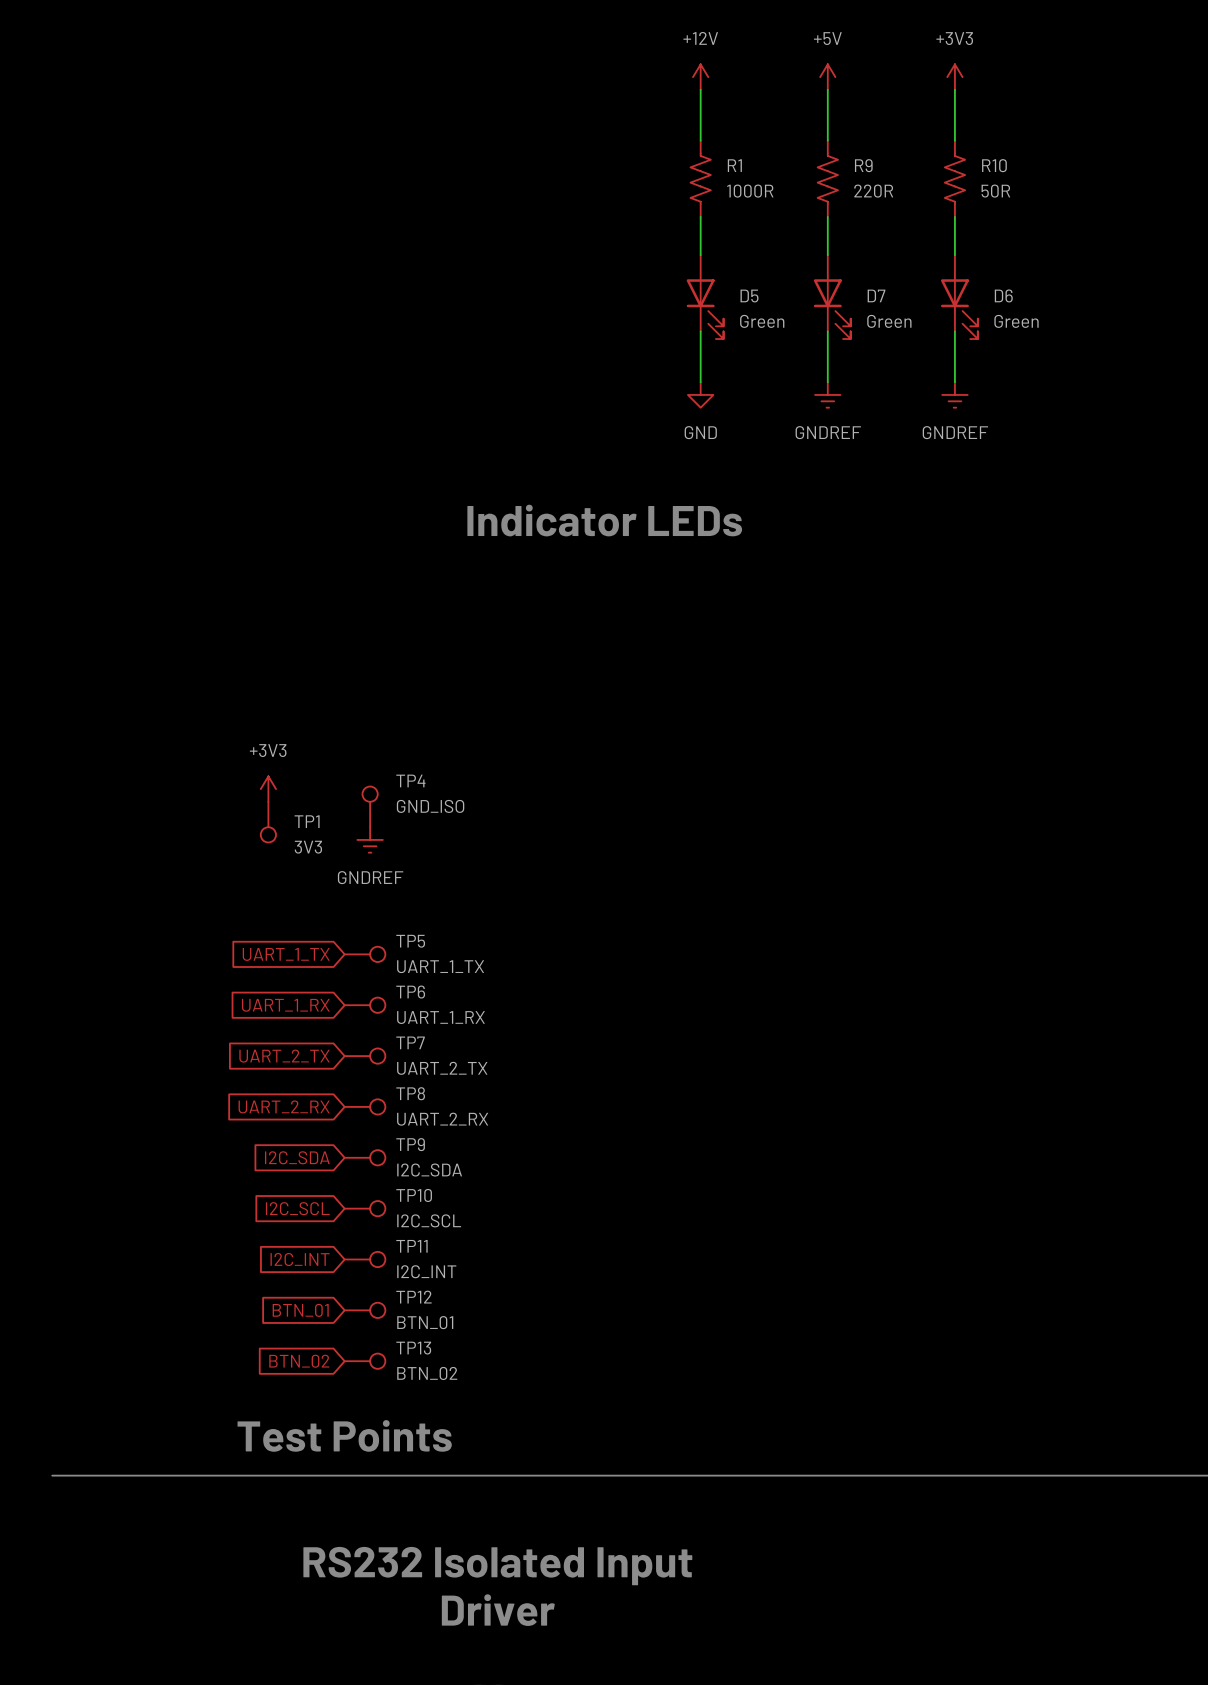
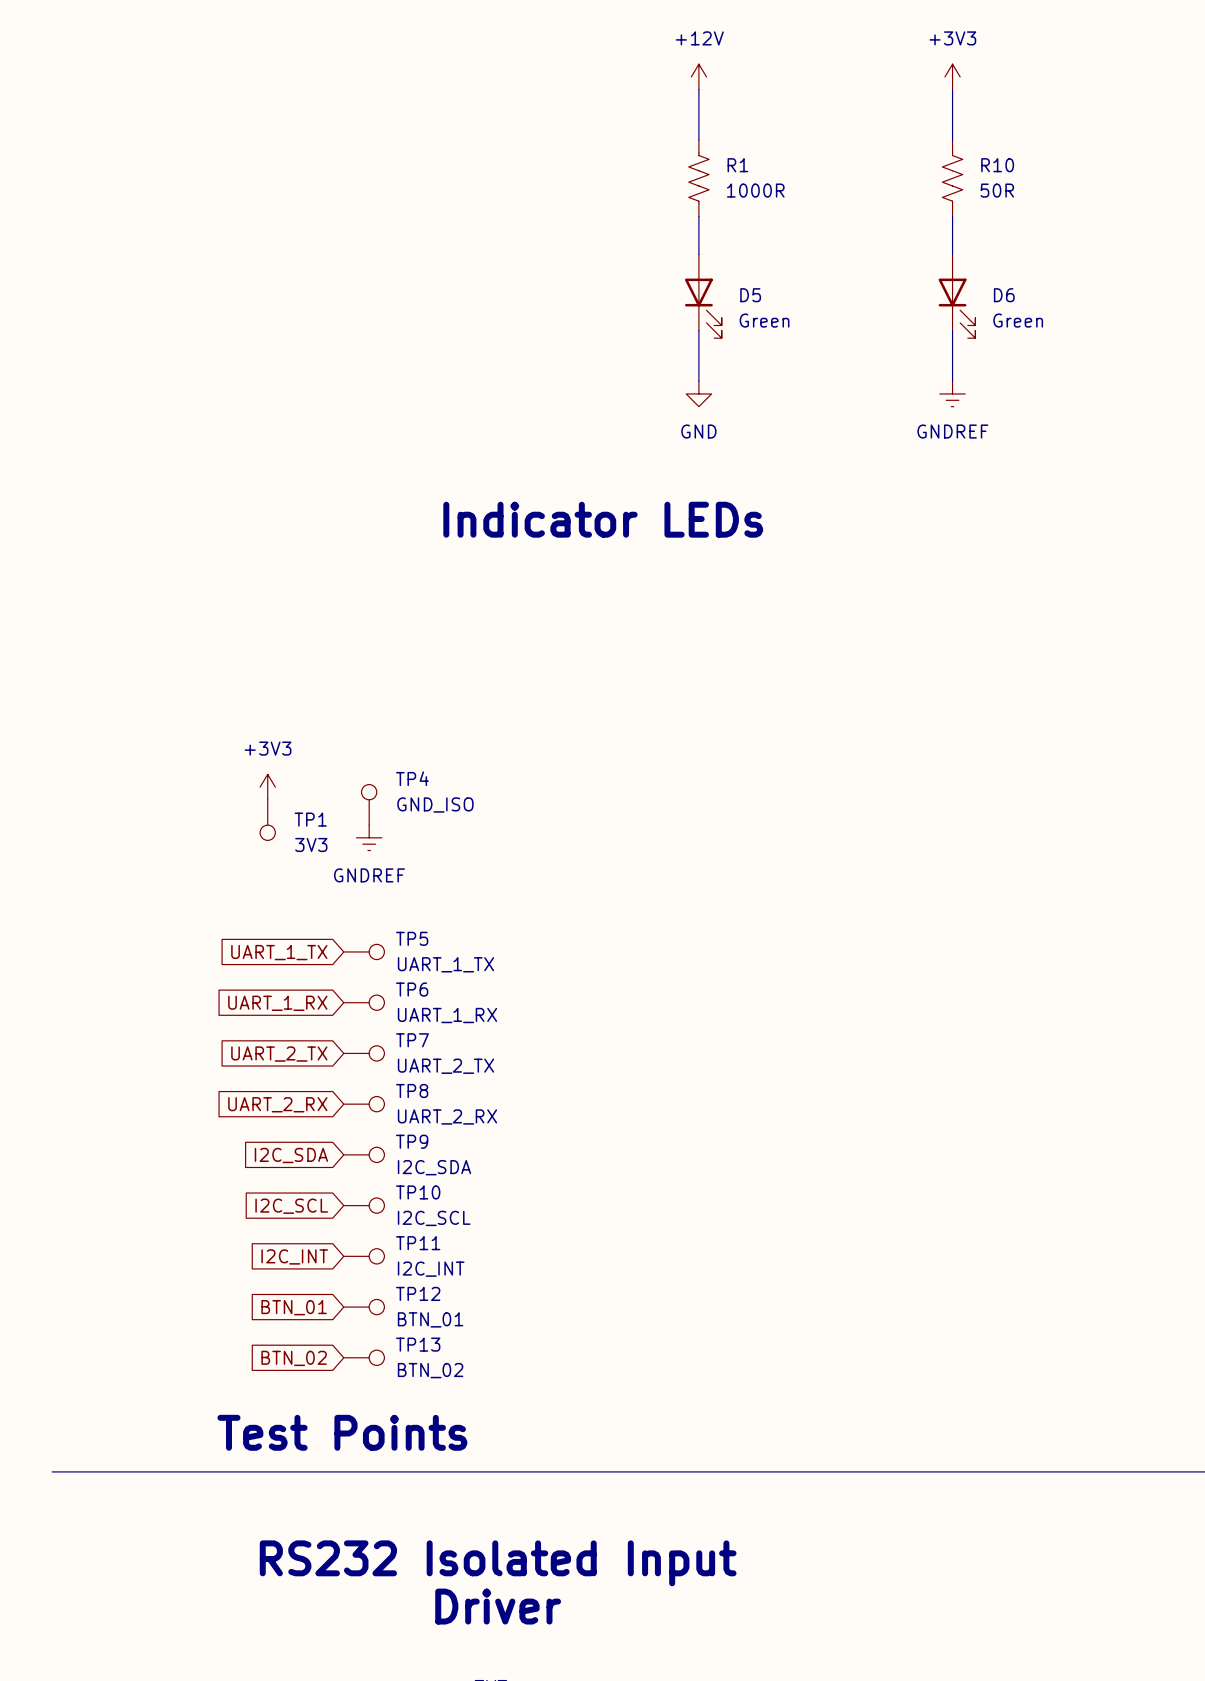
power symbol: +5V (827, 77) -> none
wire: (827, 89) (827, 140) -> none
R9: 220R (827, 178) -> none
wire: (827, 216) (827, 255) -> none
D7: Green (832, 297) -> none
wire: (827, 331) (827, 382) -> none
power symbol: GNDREF (827, 394) -> none

